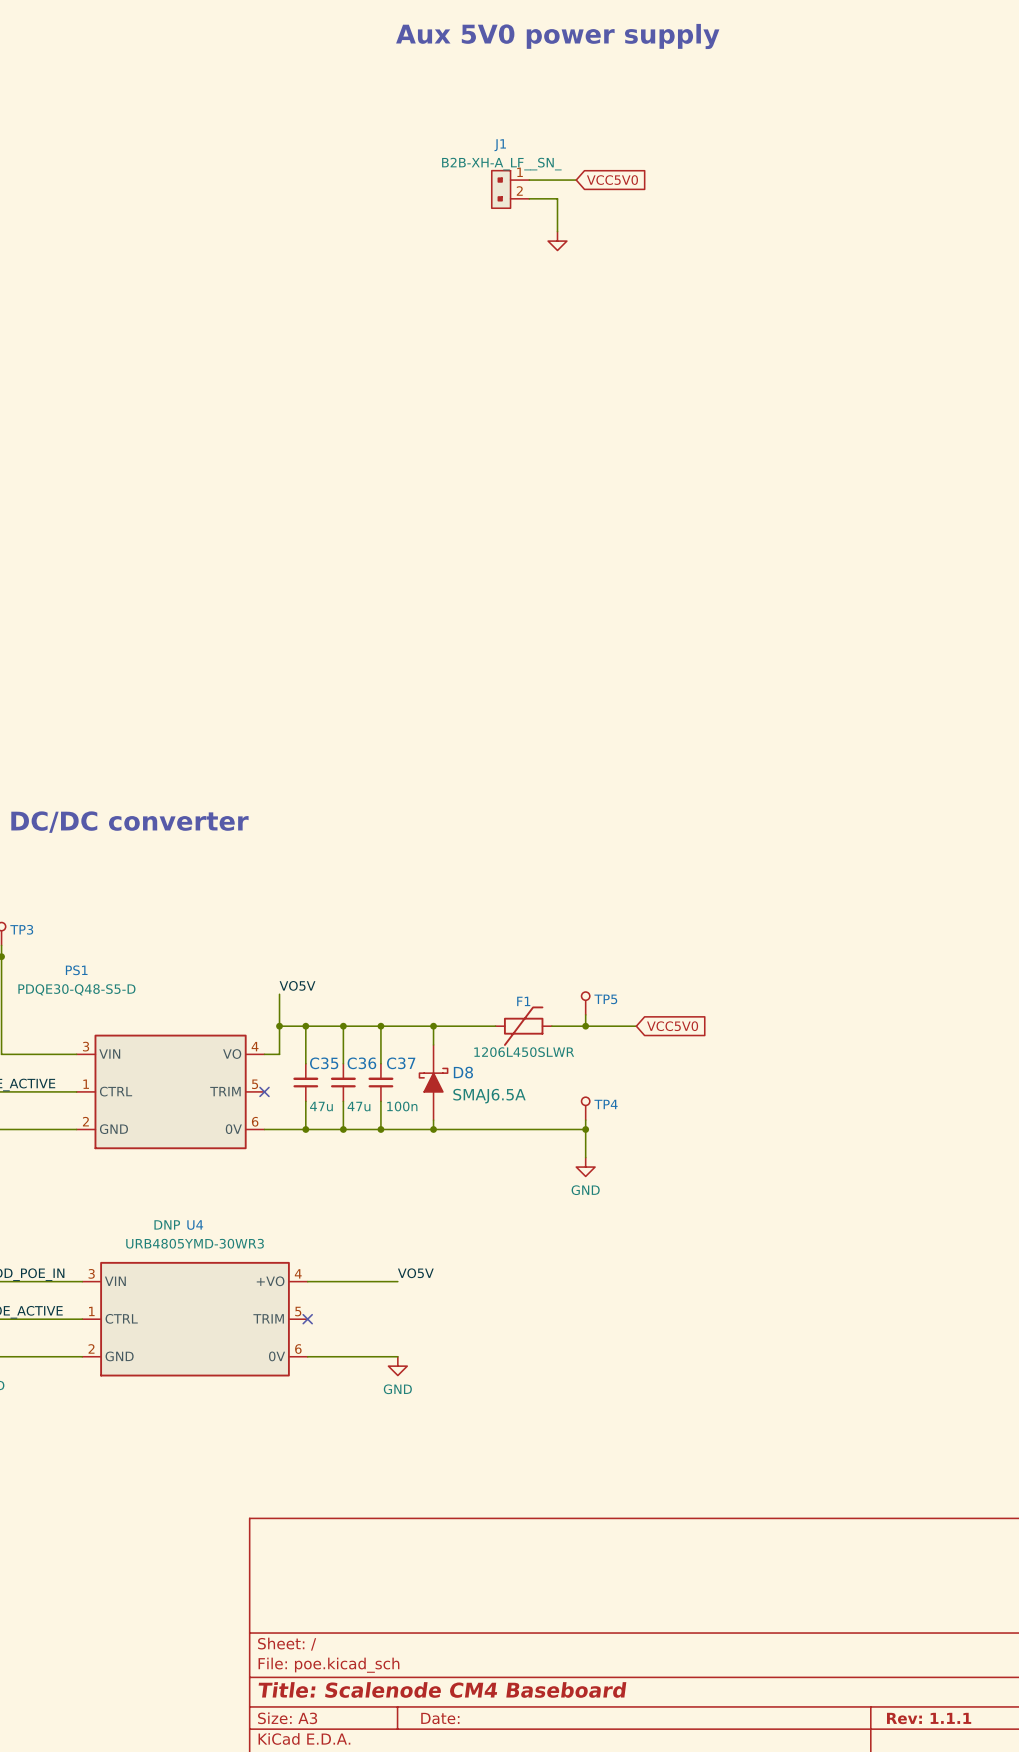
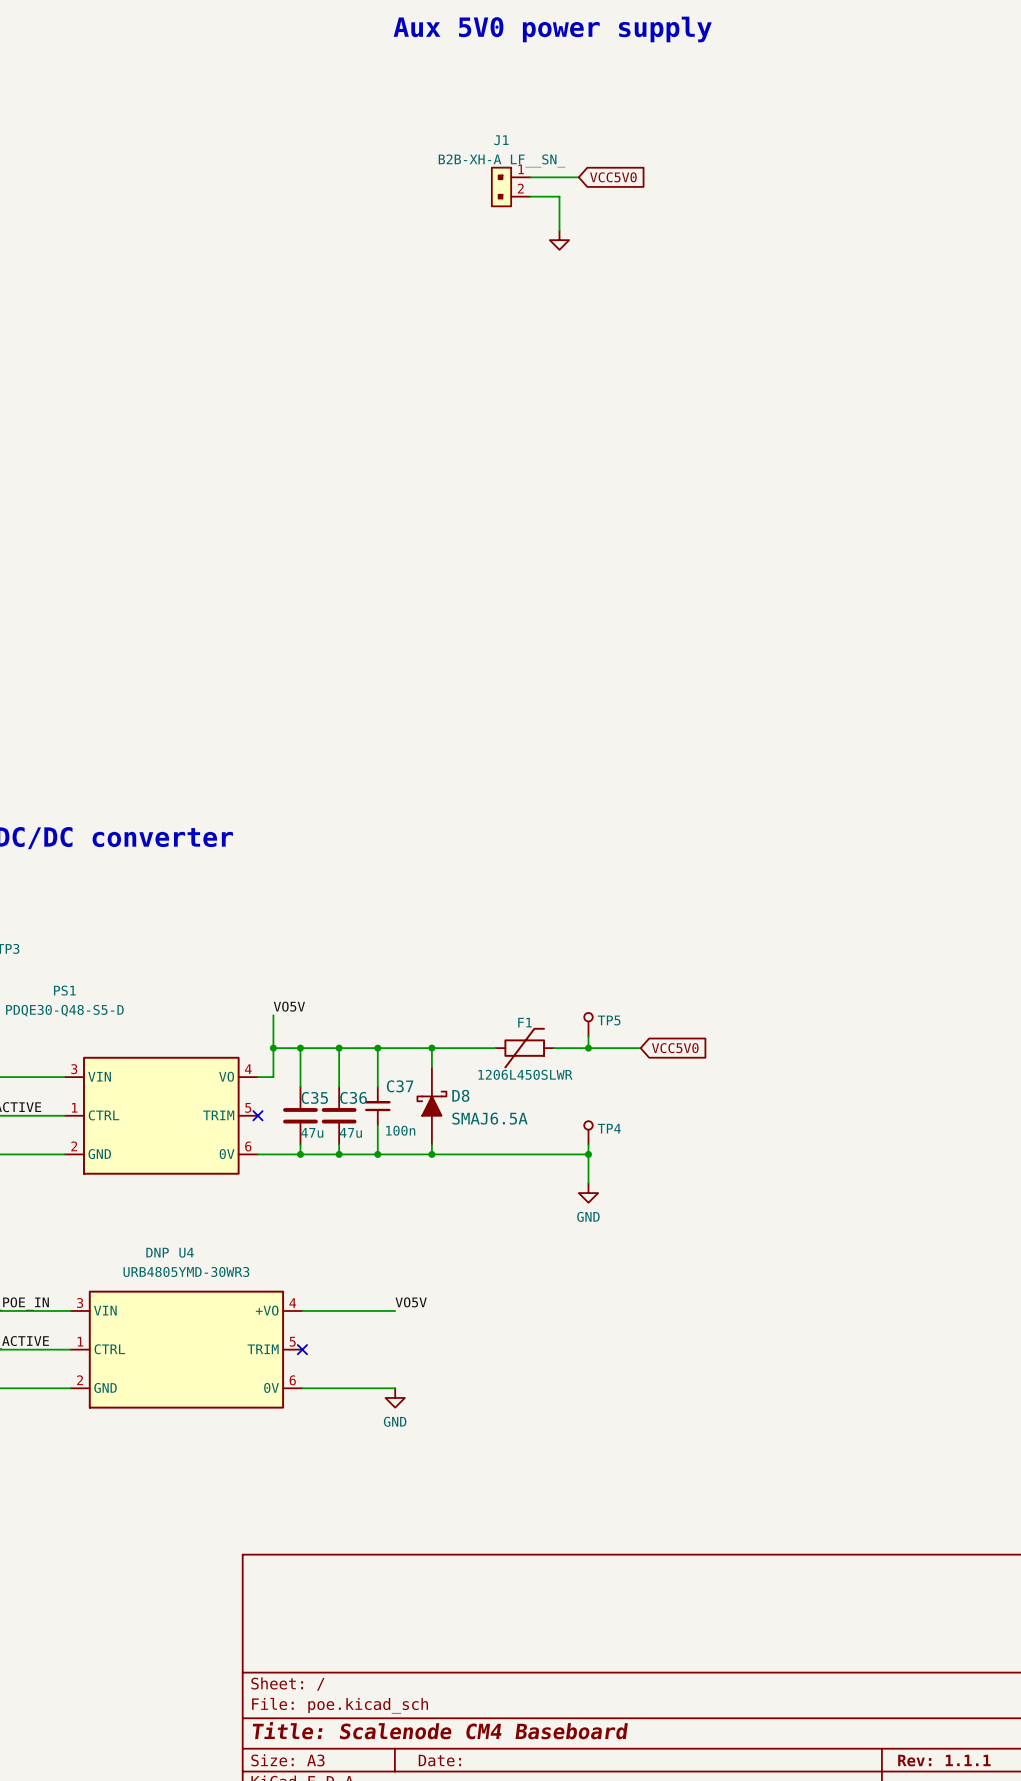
C35 symbol: [293, 1063, 319, 1102] -> [283, 1086, 318, 1145]
C36 symbol: [330, 1063, 356, 1102] -> [321, 1086, 357, 1145]

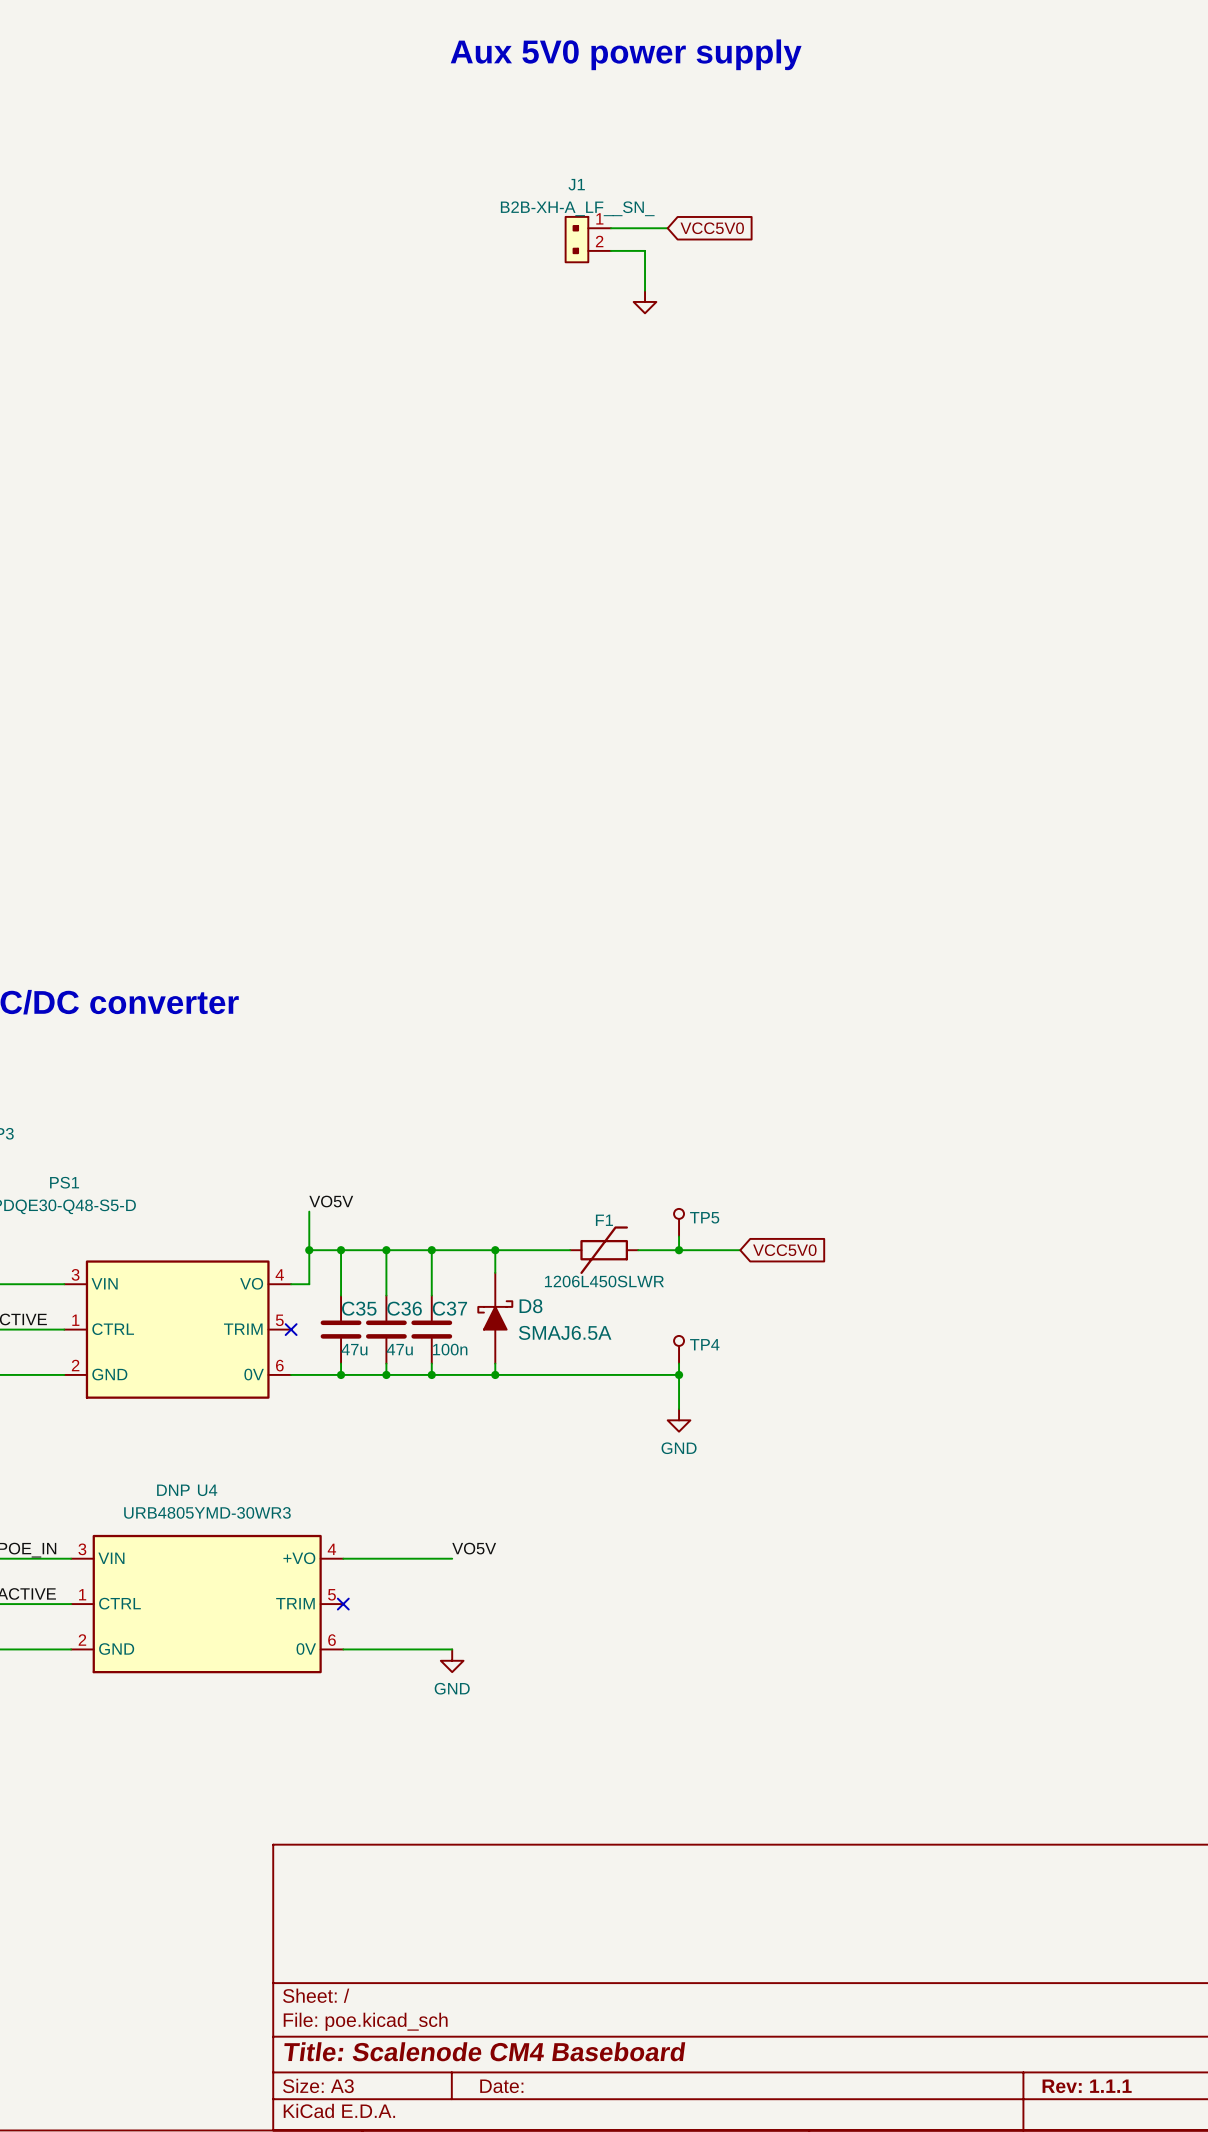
C37 symbol: [364, 1086, 391, 1126] -> [411, 1295, 453, 1364]

